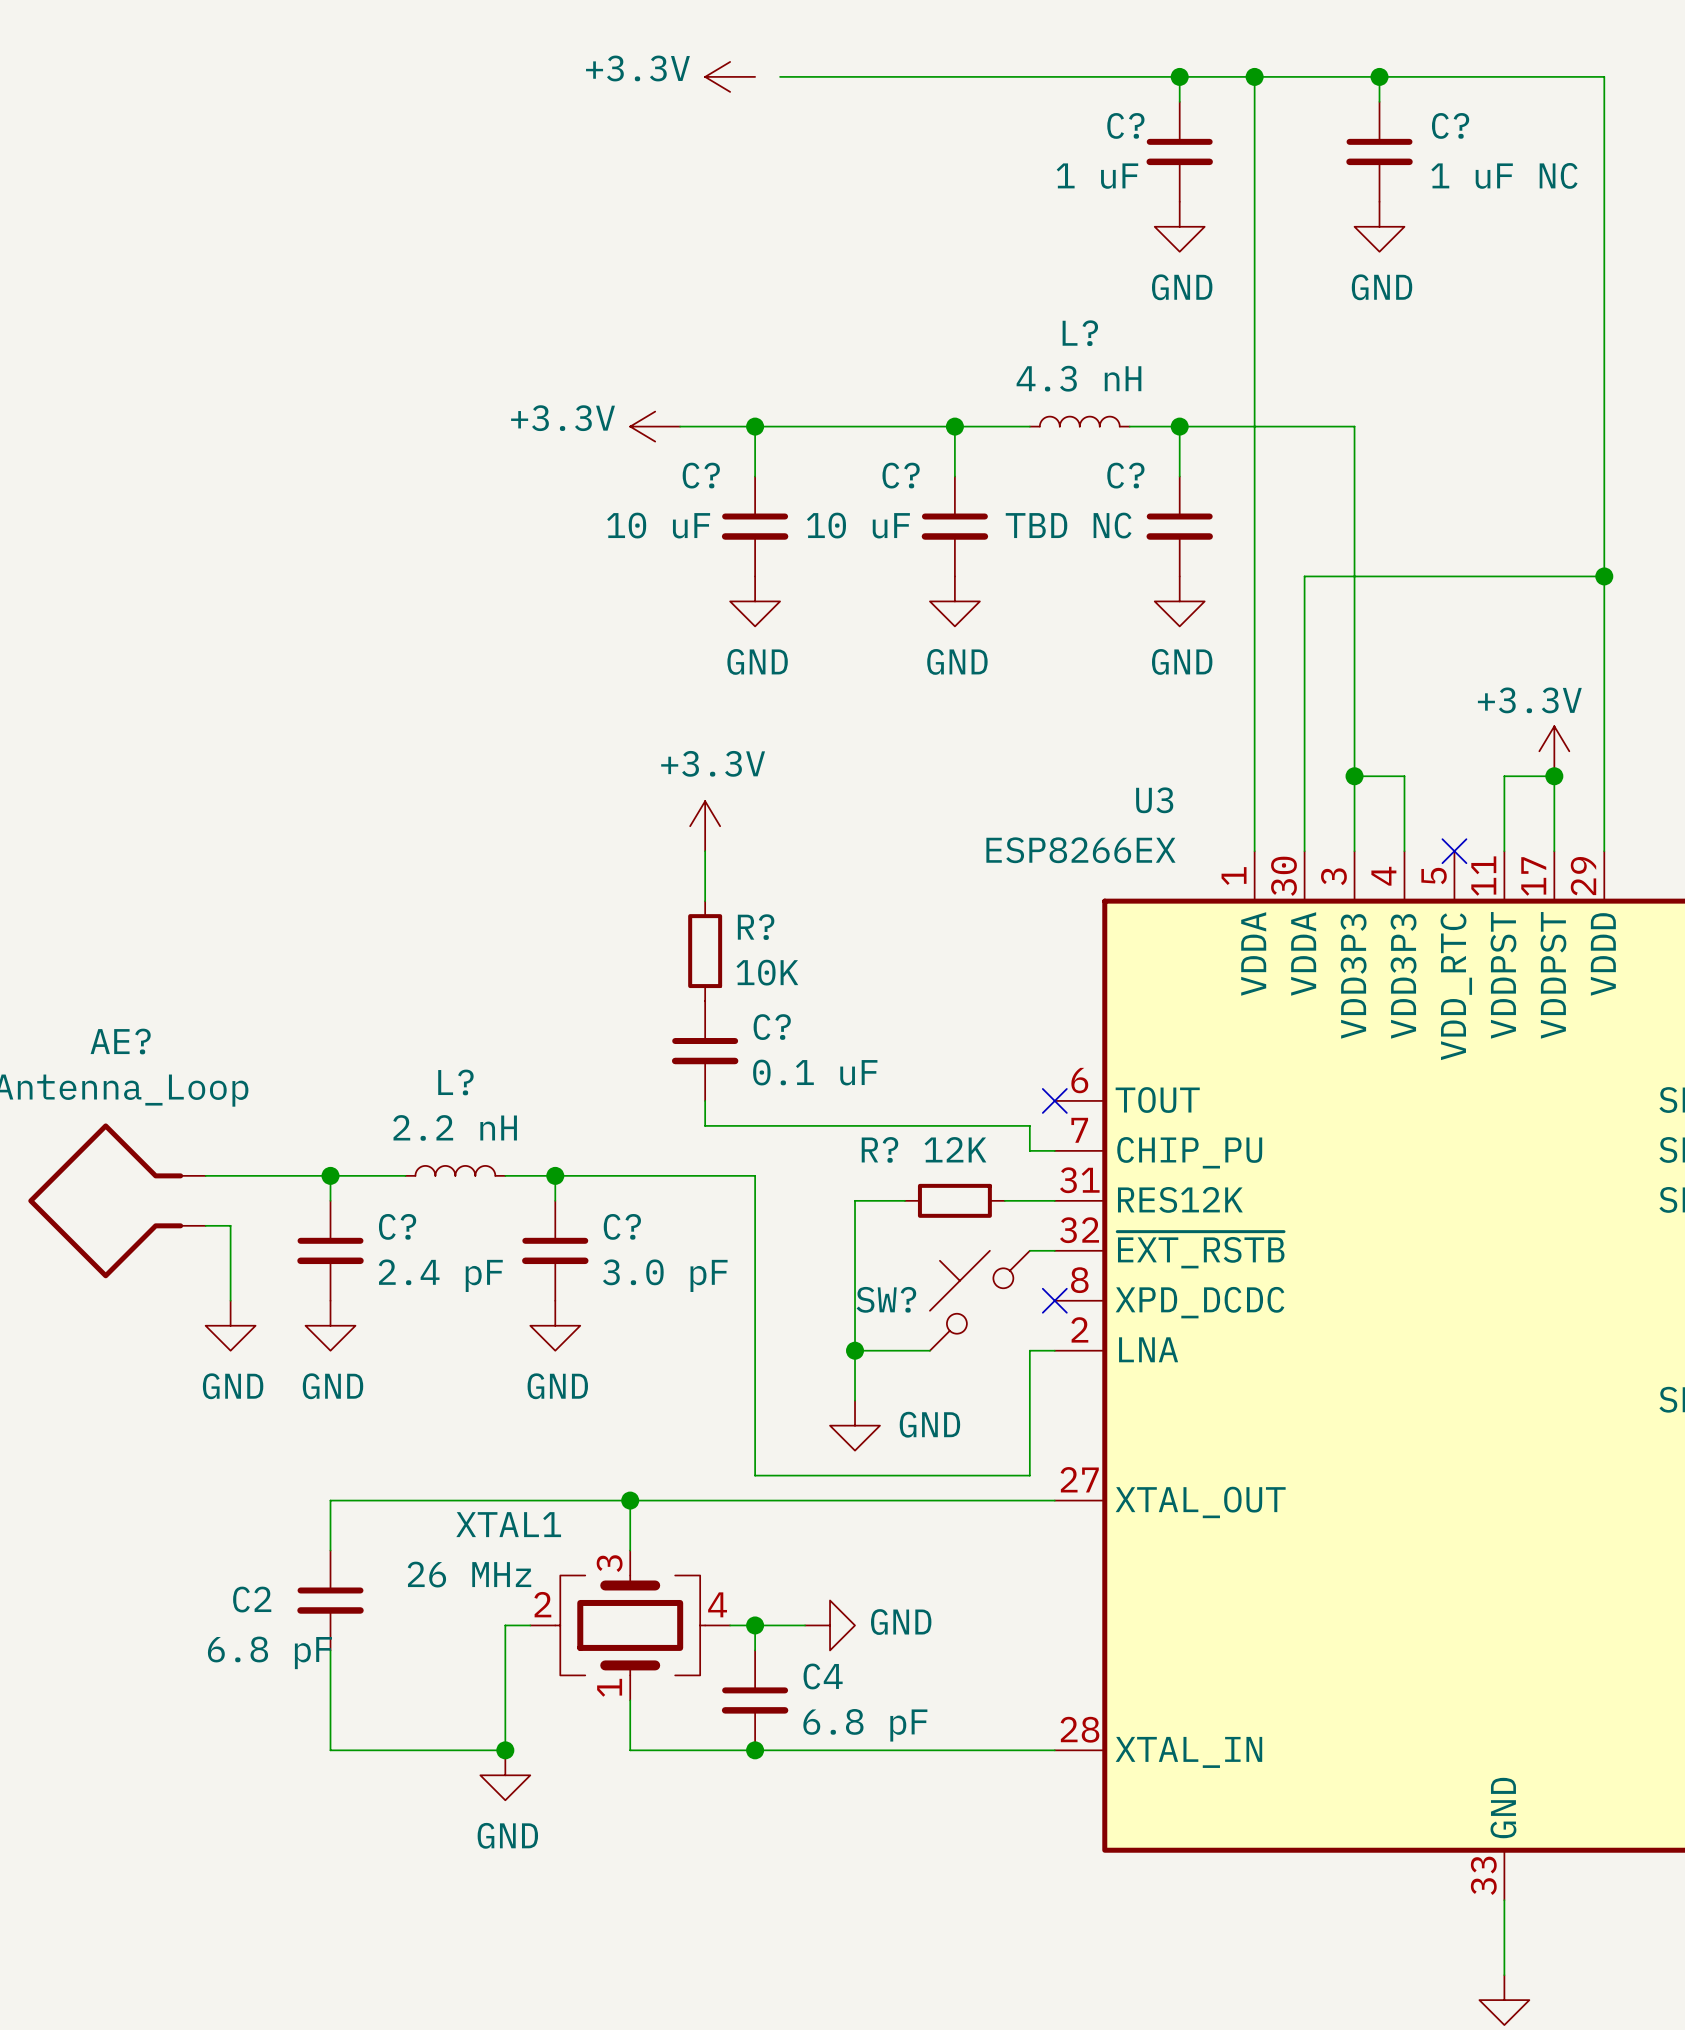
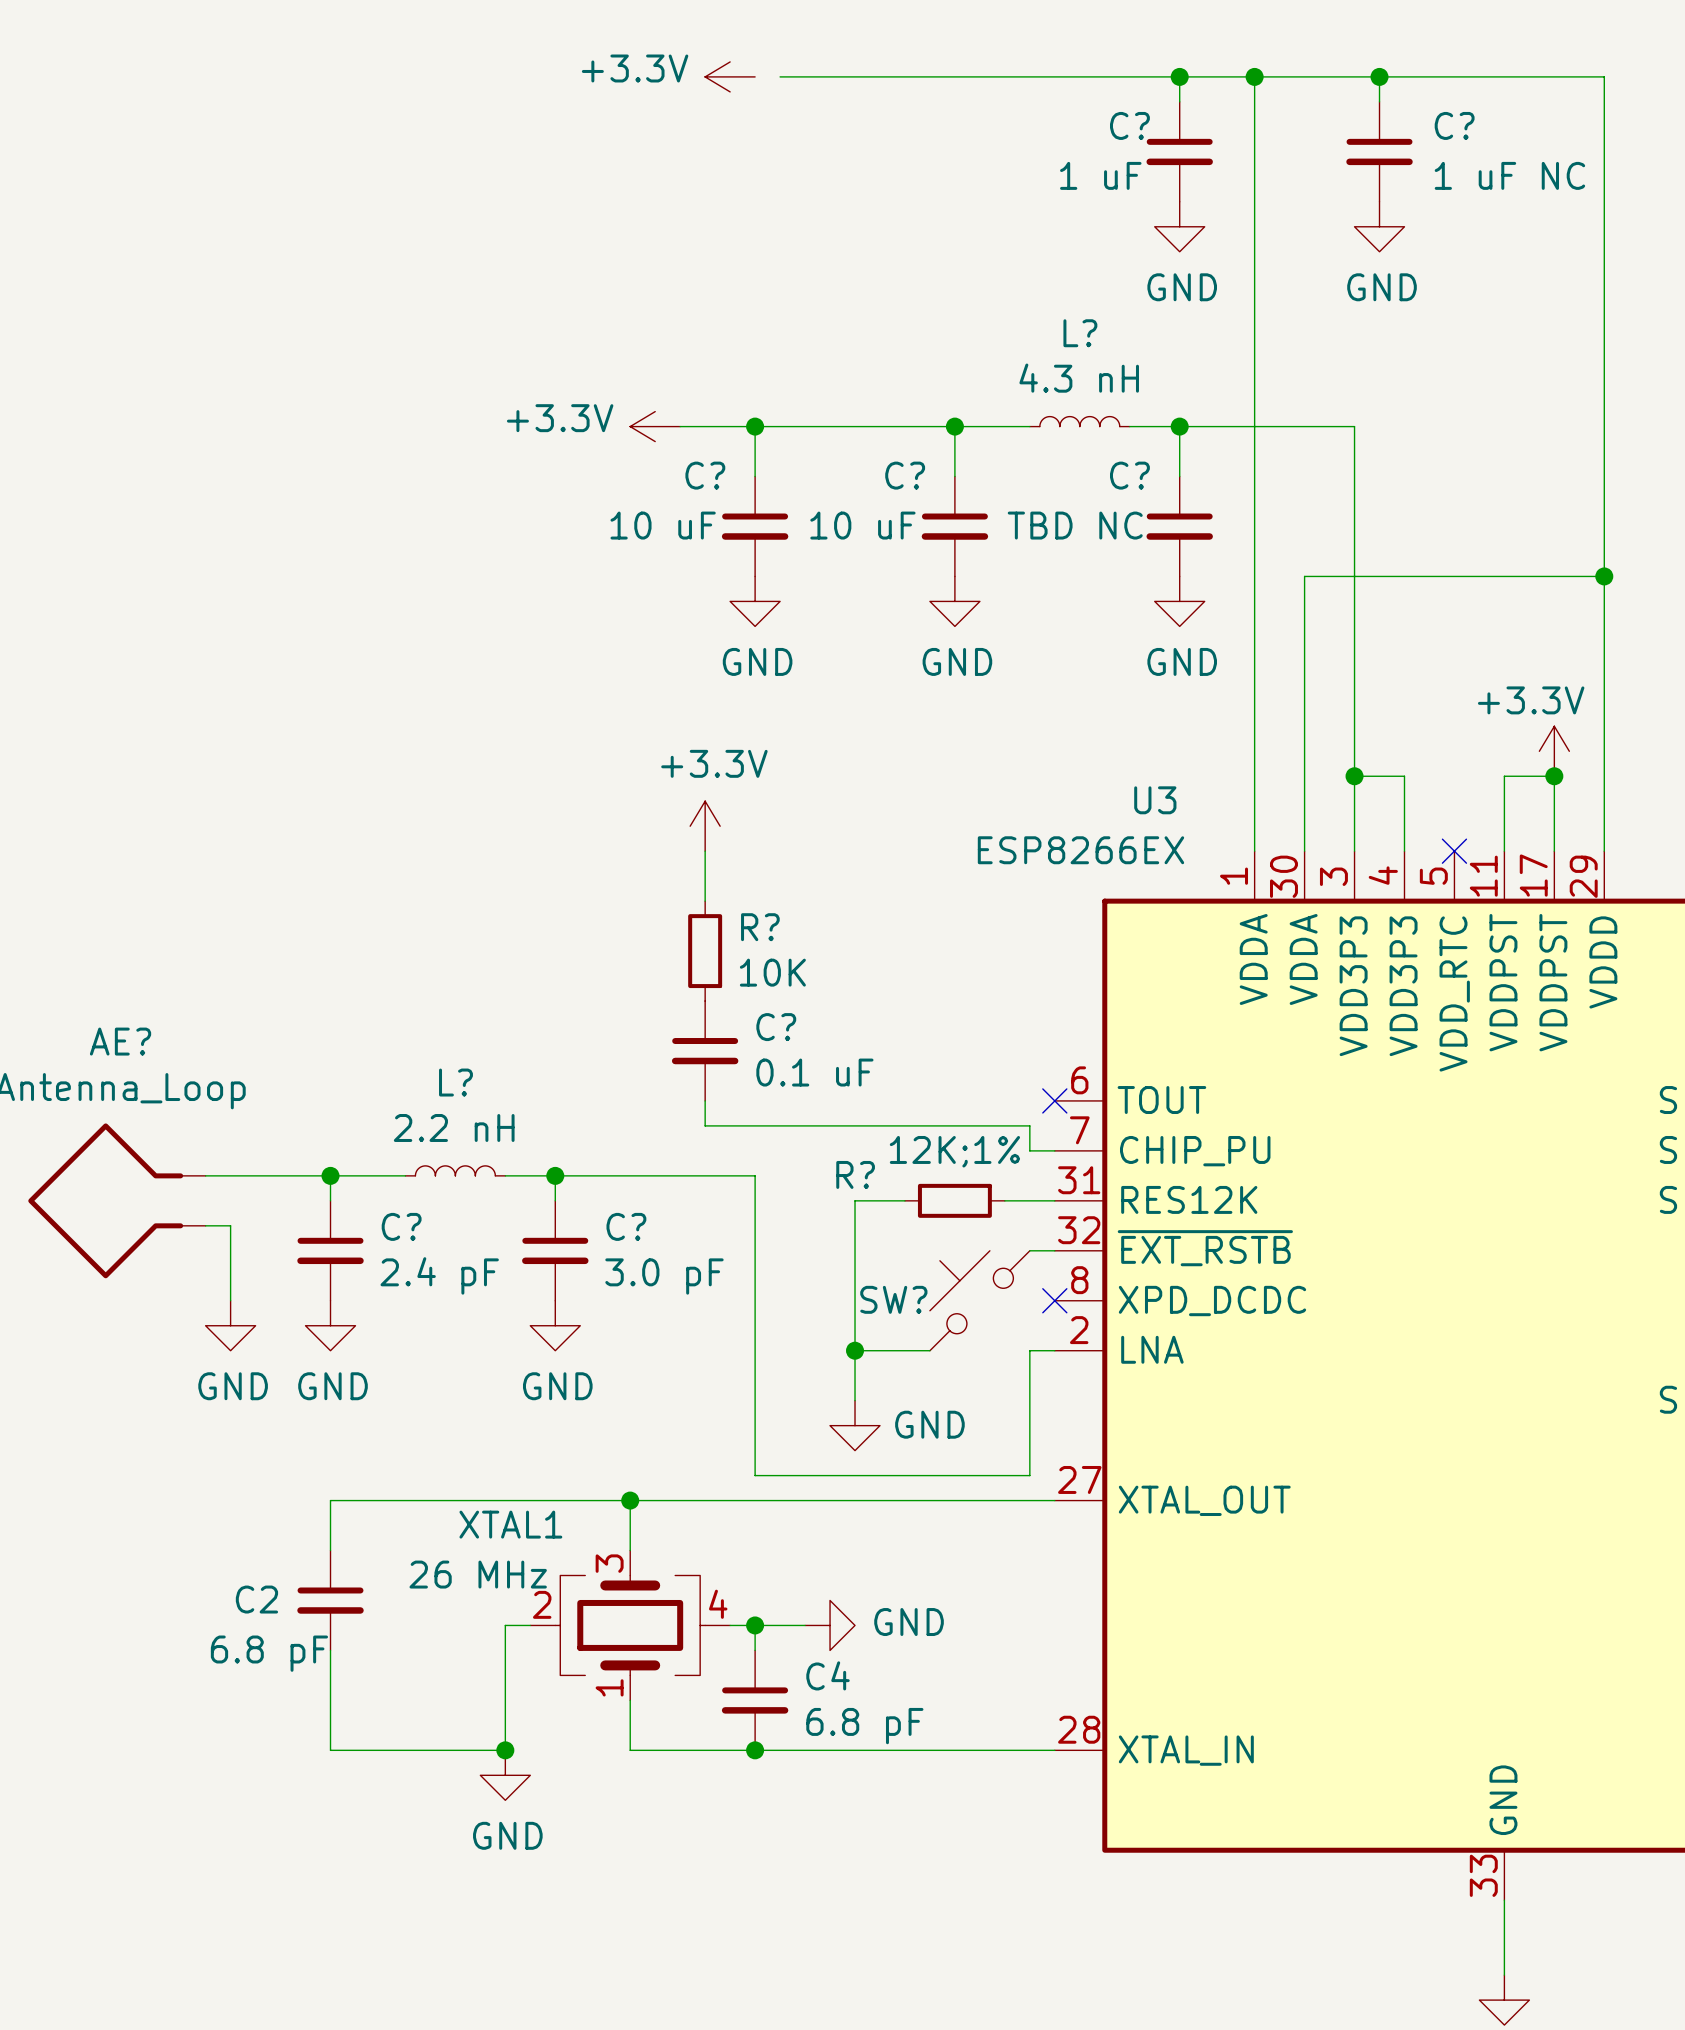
R? name position: R? (879, 1149) -> R? (855, 1174)
R? value: 12K (955, 1149) -> 12K;1% (954, 1151)

